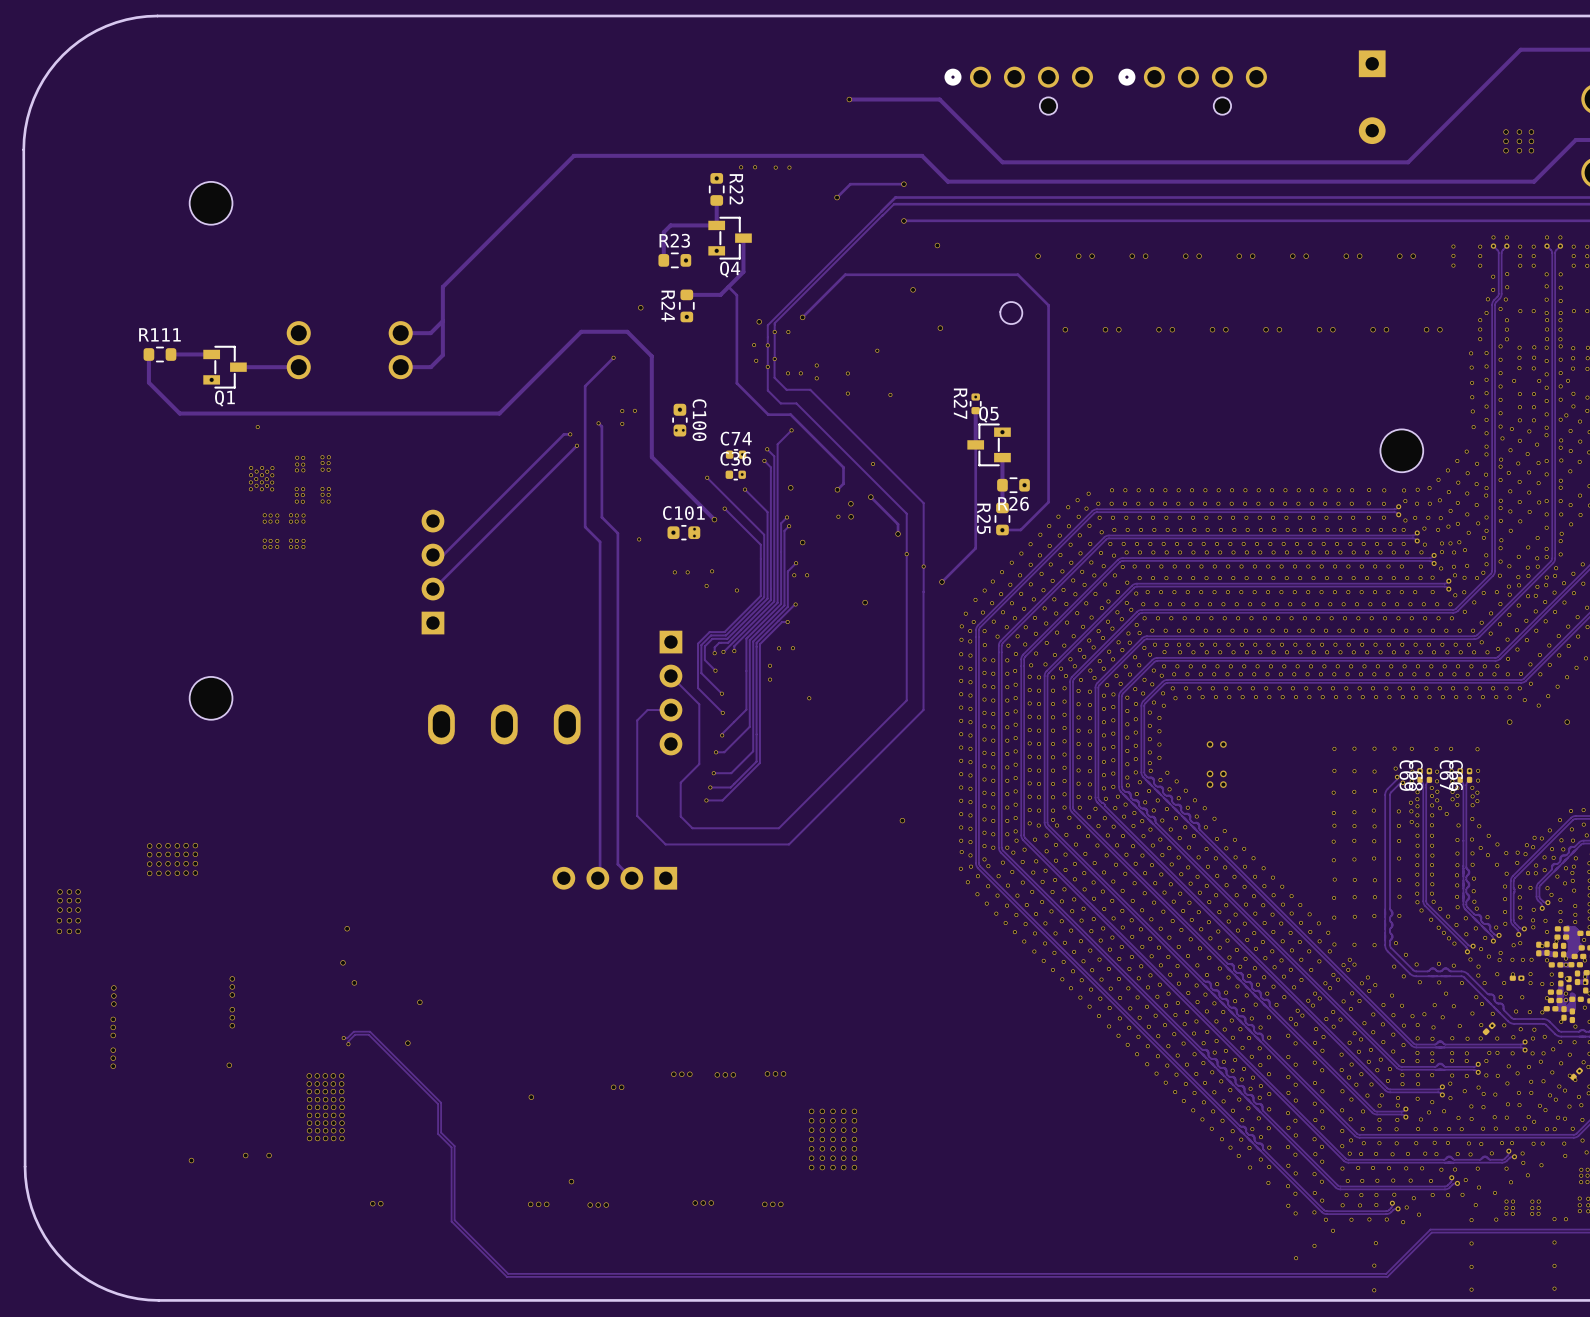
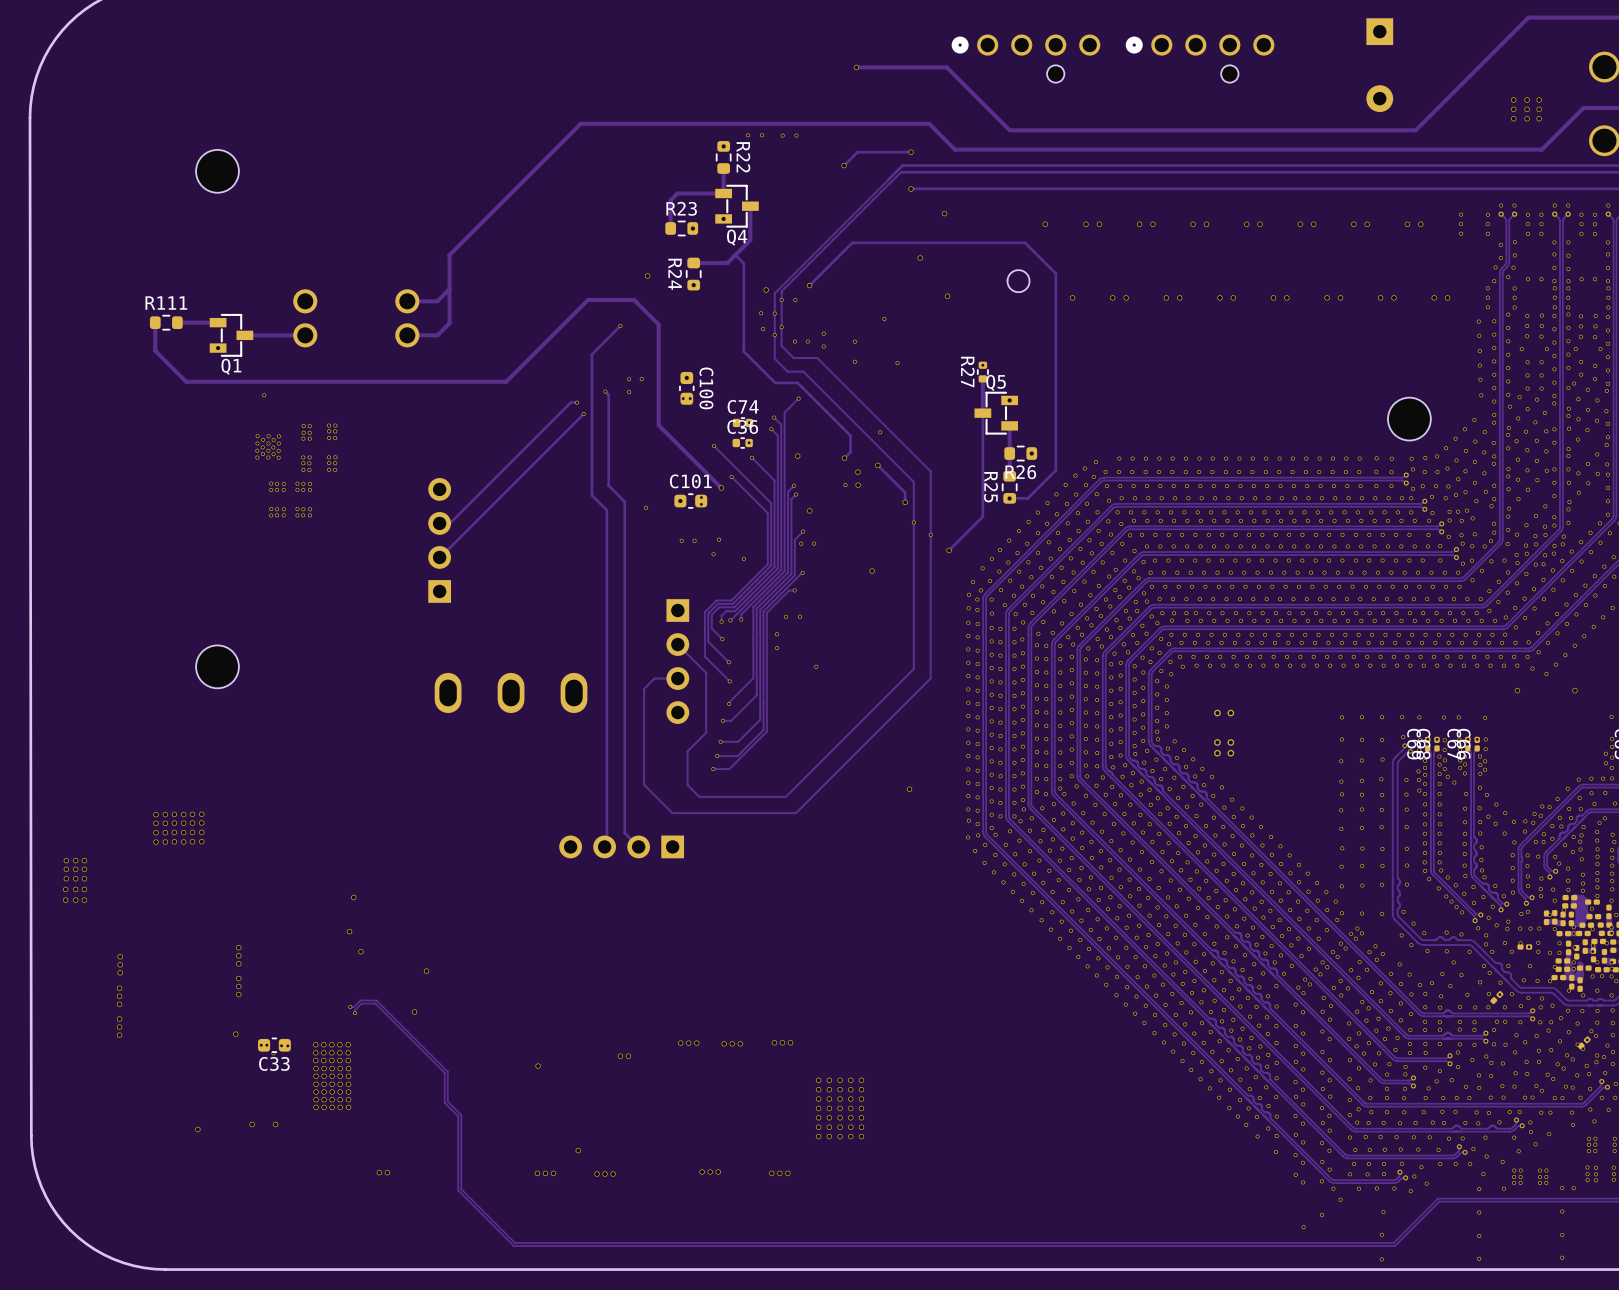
via: none -> (261, 1045)
via: none -> (266, 1045)
C33: none -> (274, 1045)
via: none -> (281, 1045)
via: none -> (287, 1045)
via: none -> (273, 1053)

